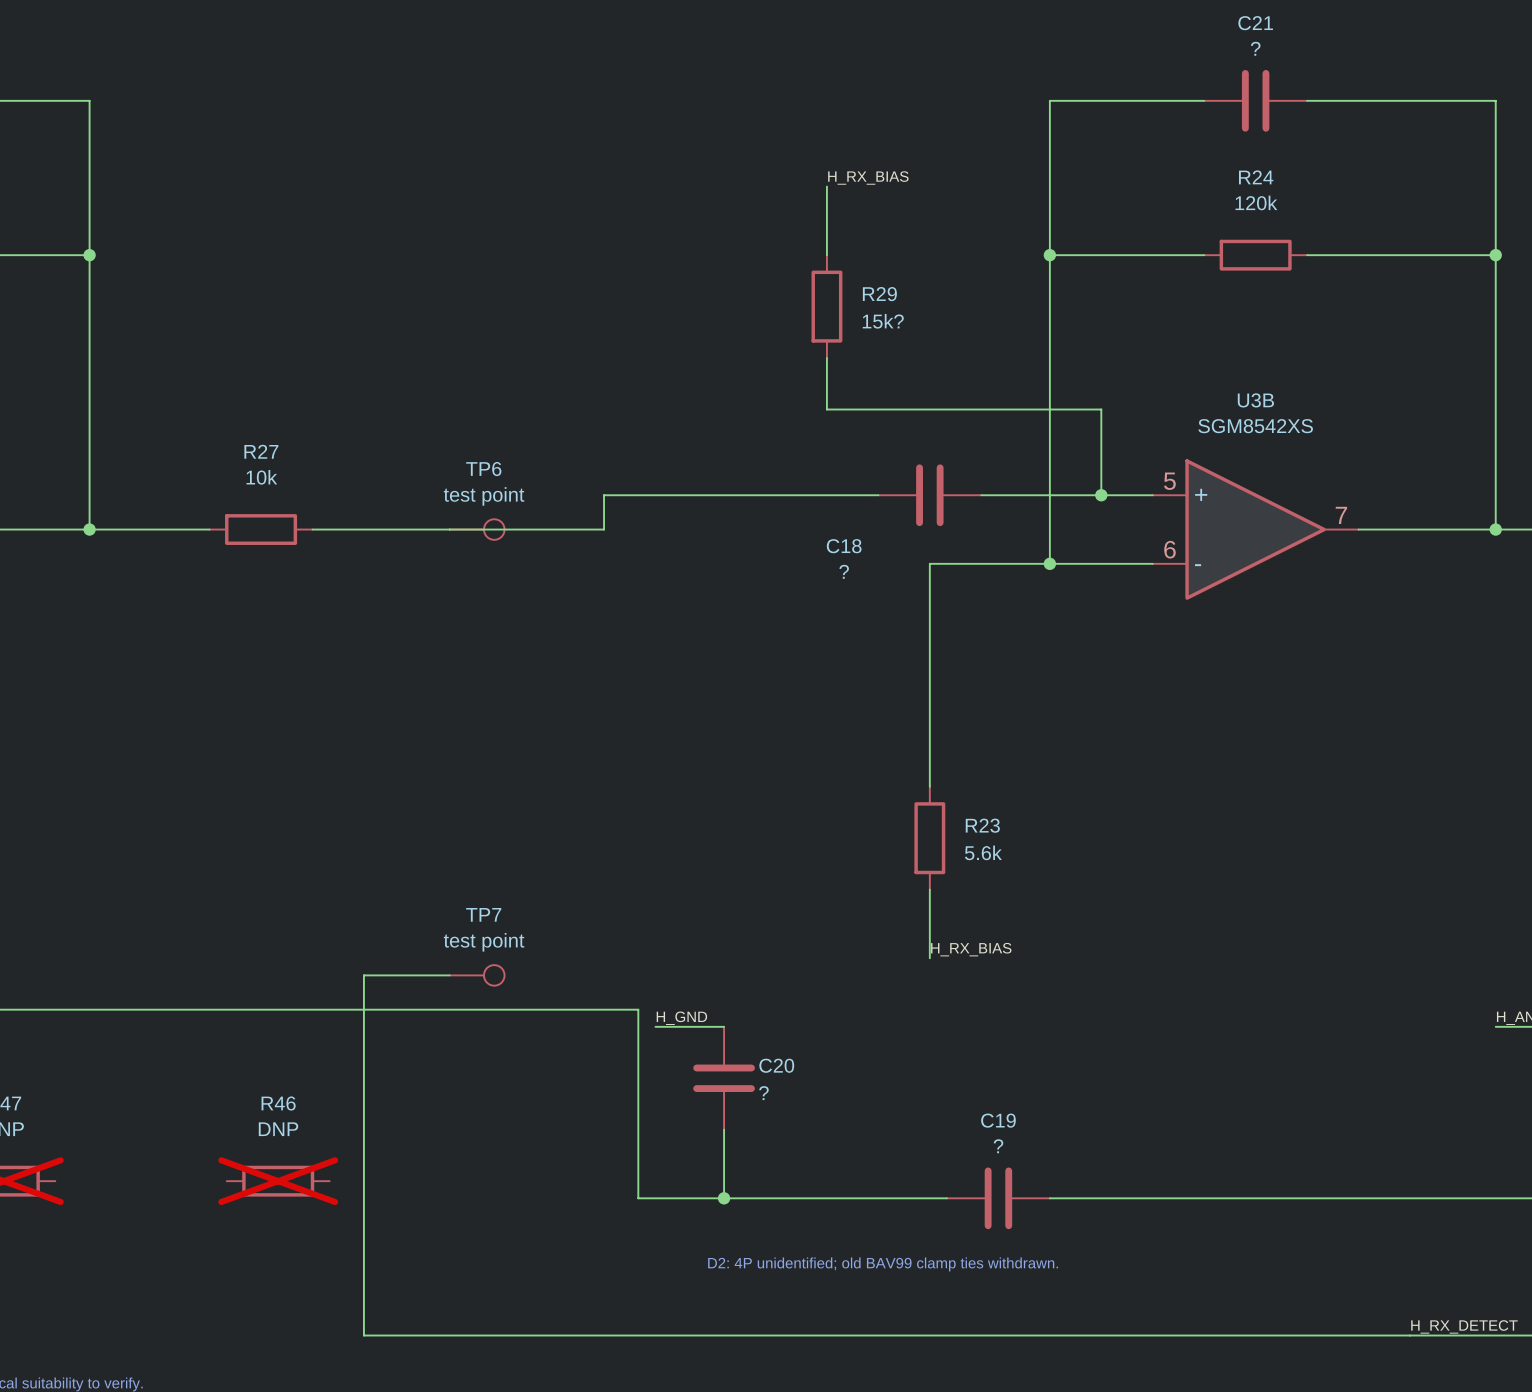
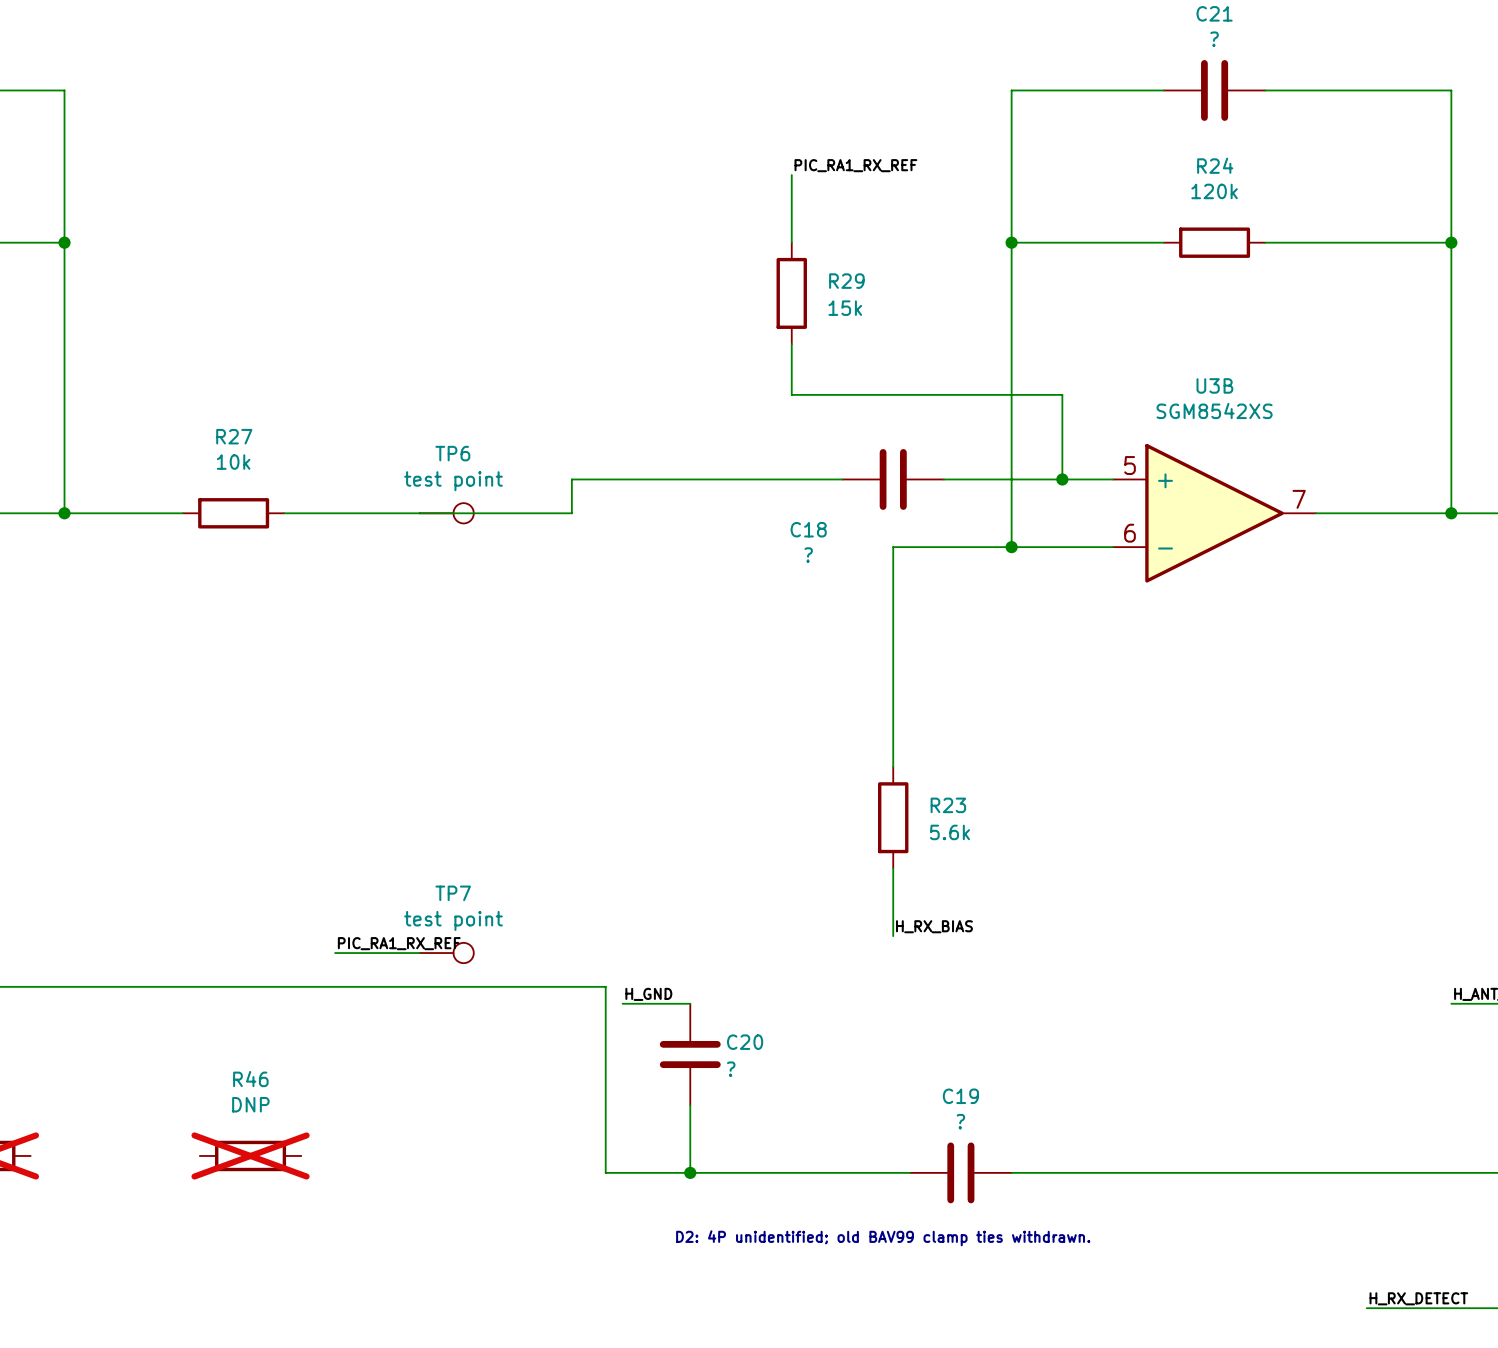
label: H_RX_BIAS (868, 177) -> PIC_RA1_RX_REF (855, 165)
R29 value: 15k? (883, 321) -> 15k (845, 308)
label: none -> PIC_RA1_RX_REF (399, 943)
wire: (363, 975) (363, 1335) (1409, 1335) -> none

